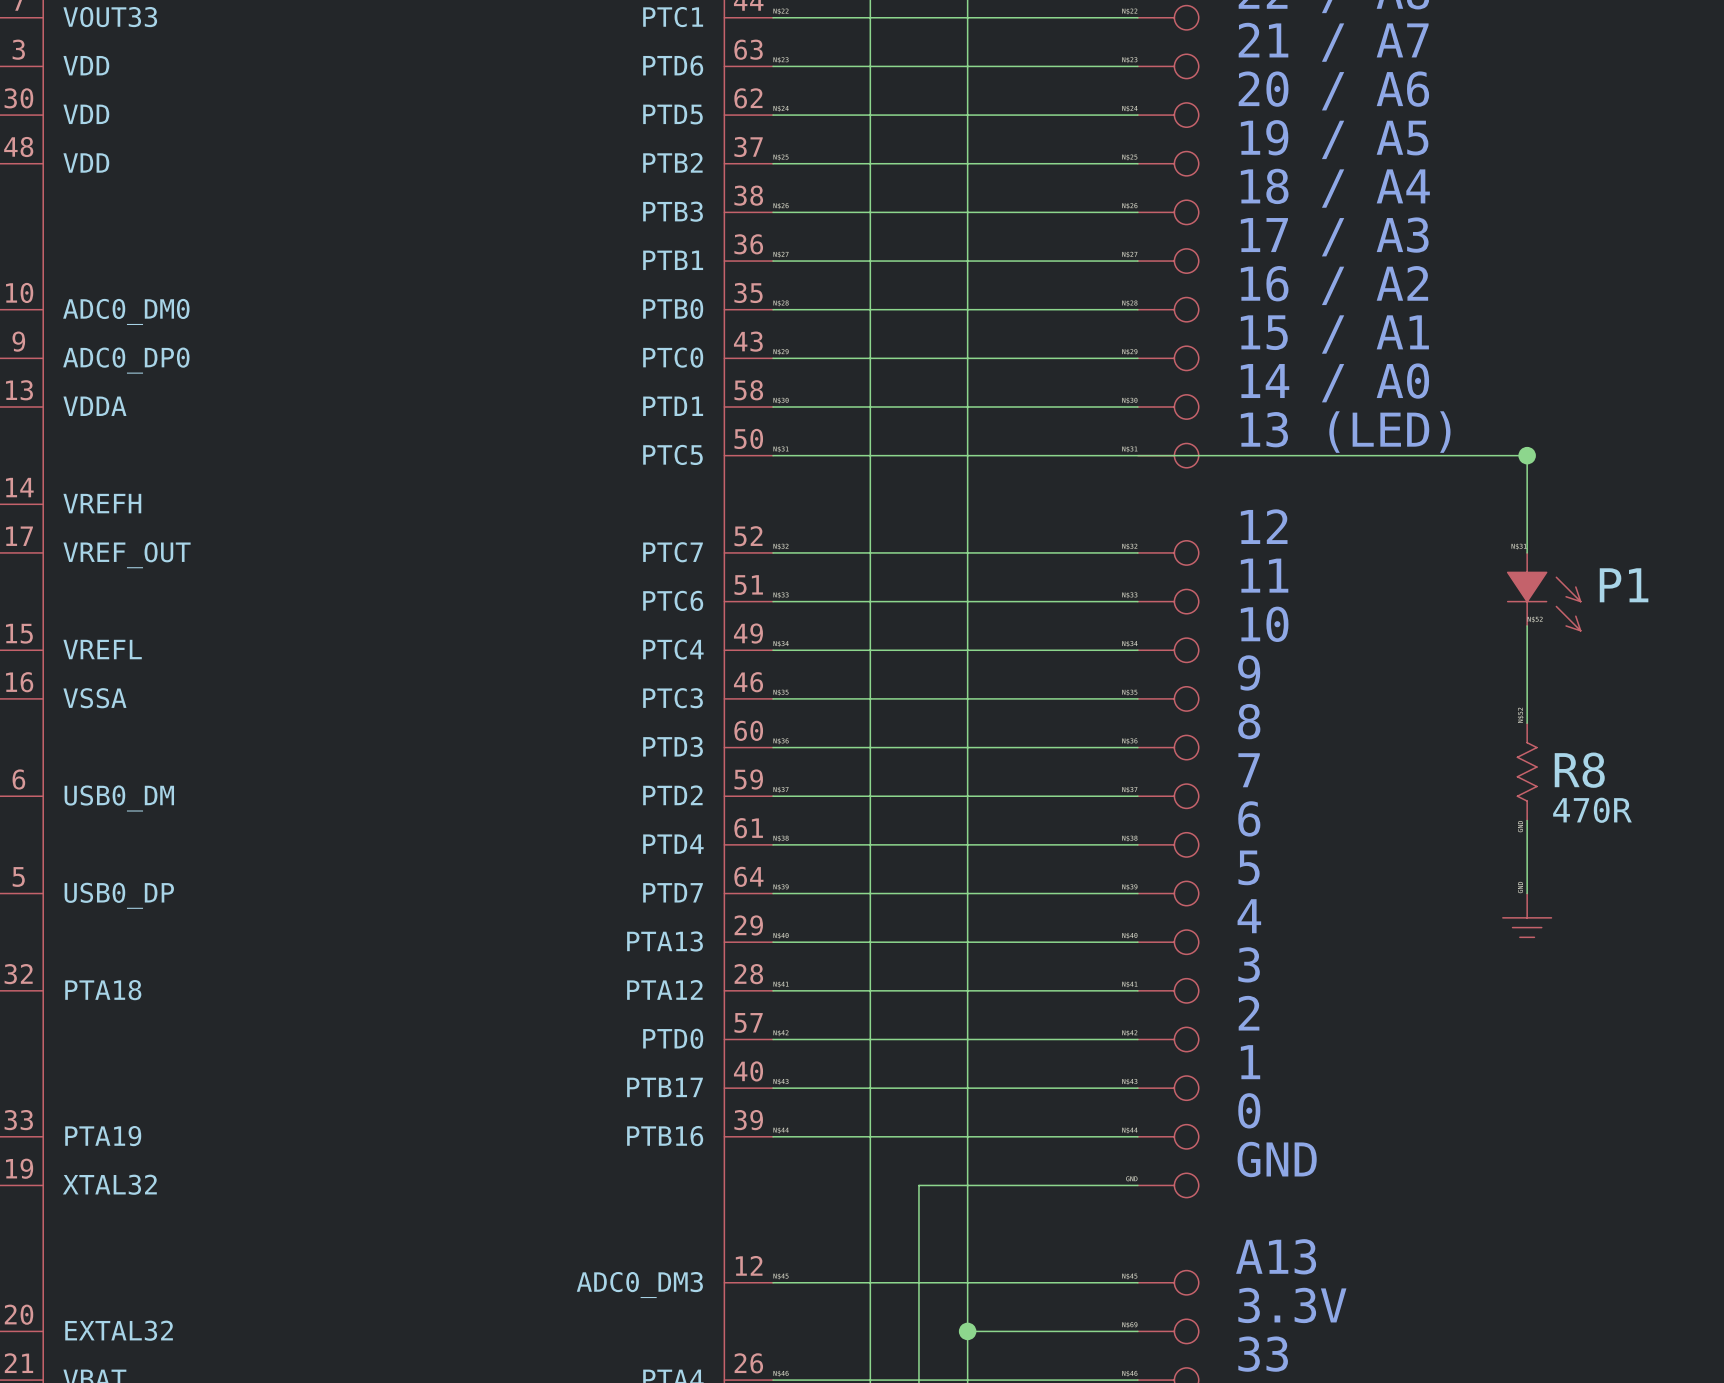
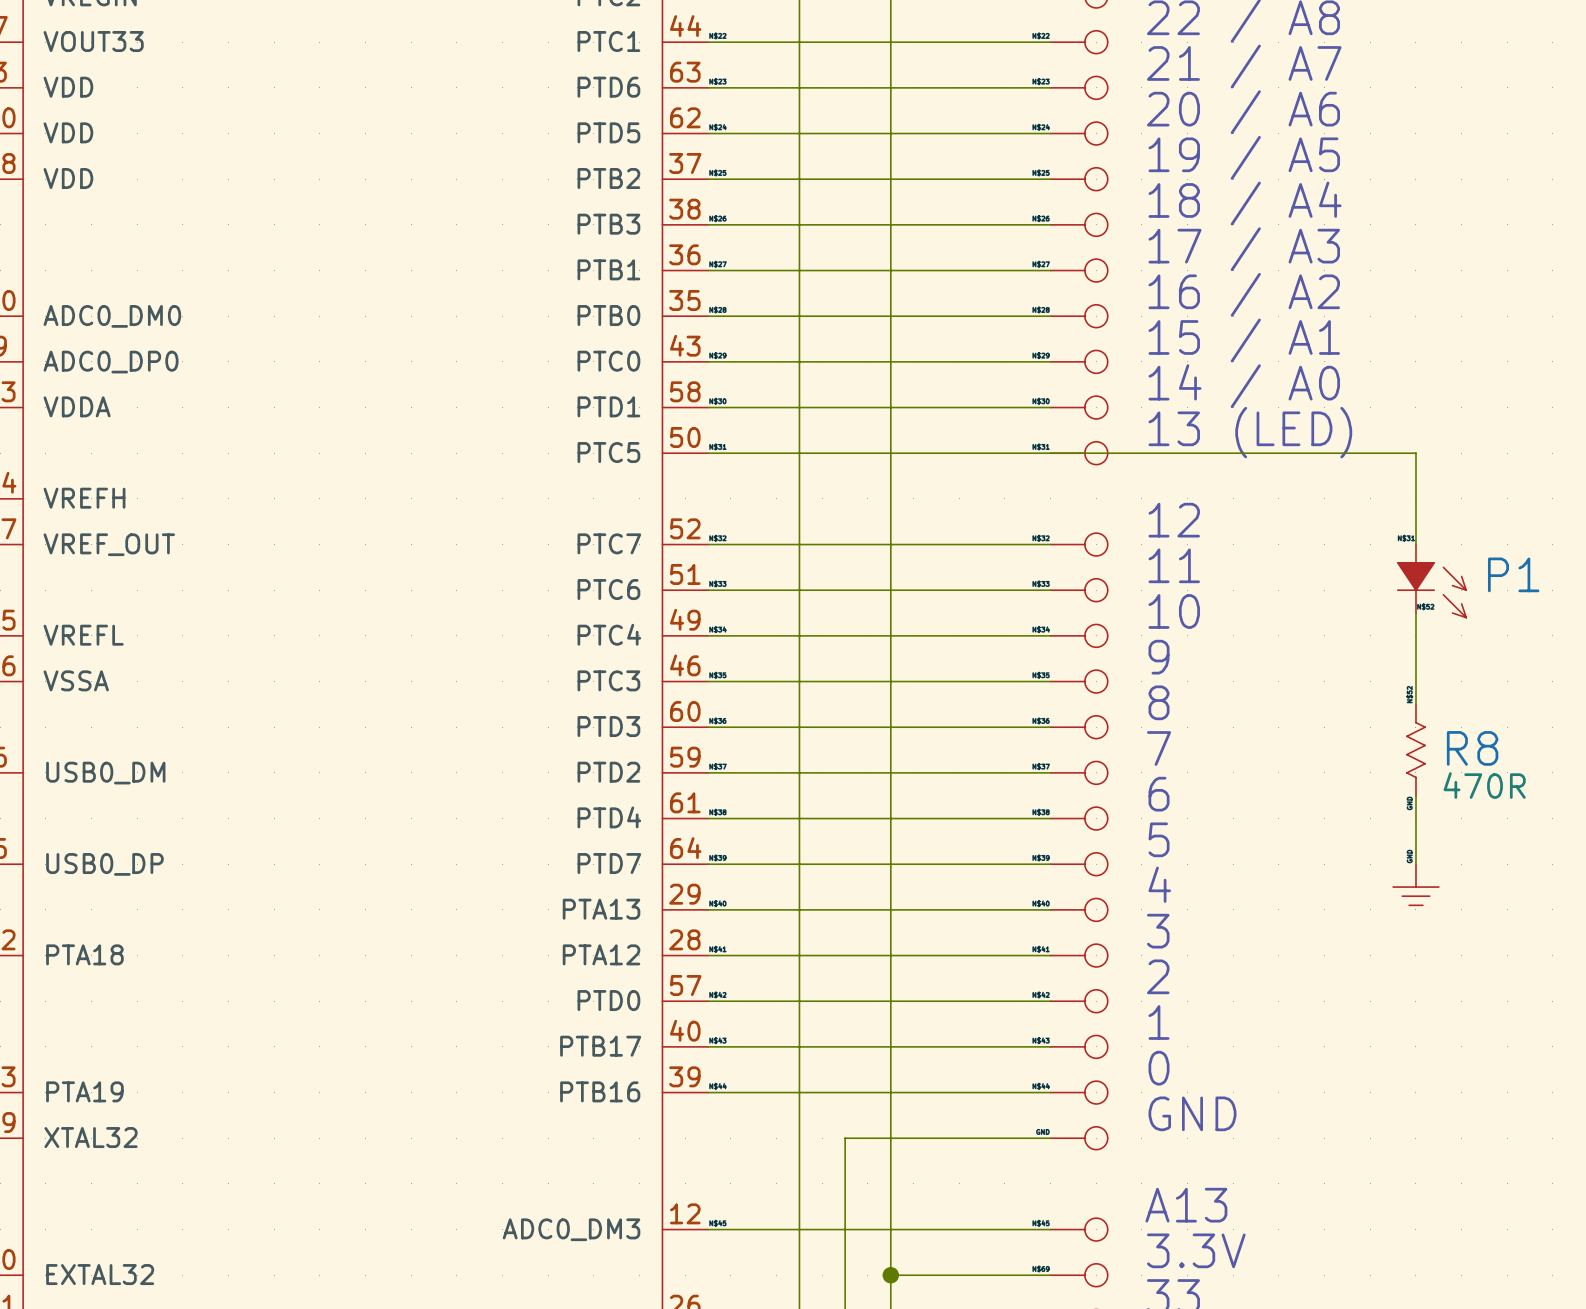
junction: (1527, 455) -> none

